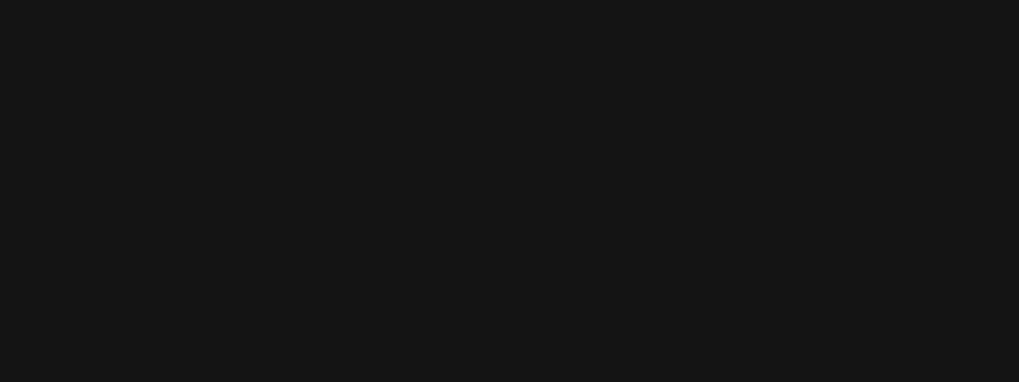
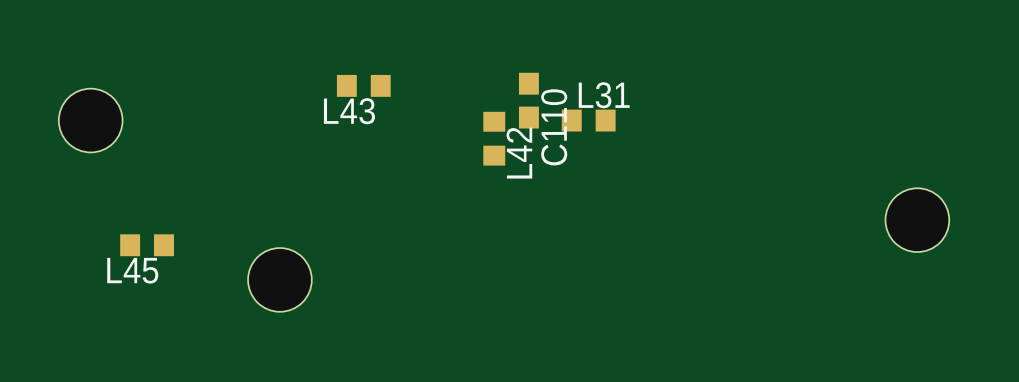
L43: none -> (363, 85)
C110: none -> (528, 100)
hole: none -> (90, 120)
L31: none -> (588, 120)
L42: none -> (494, 138)
hole: none -> (917, 220)
L45: none -> (147, 245)
hole: none -> (279, 279)

